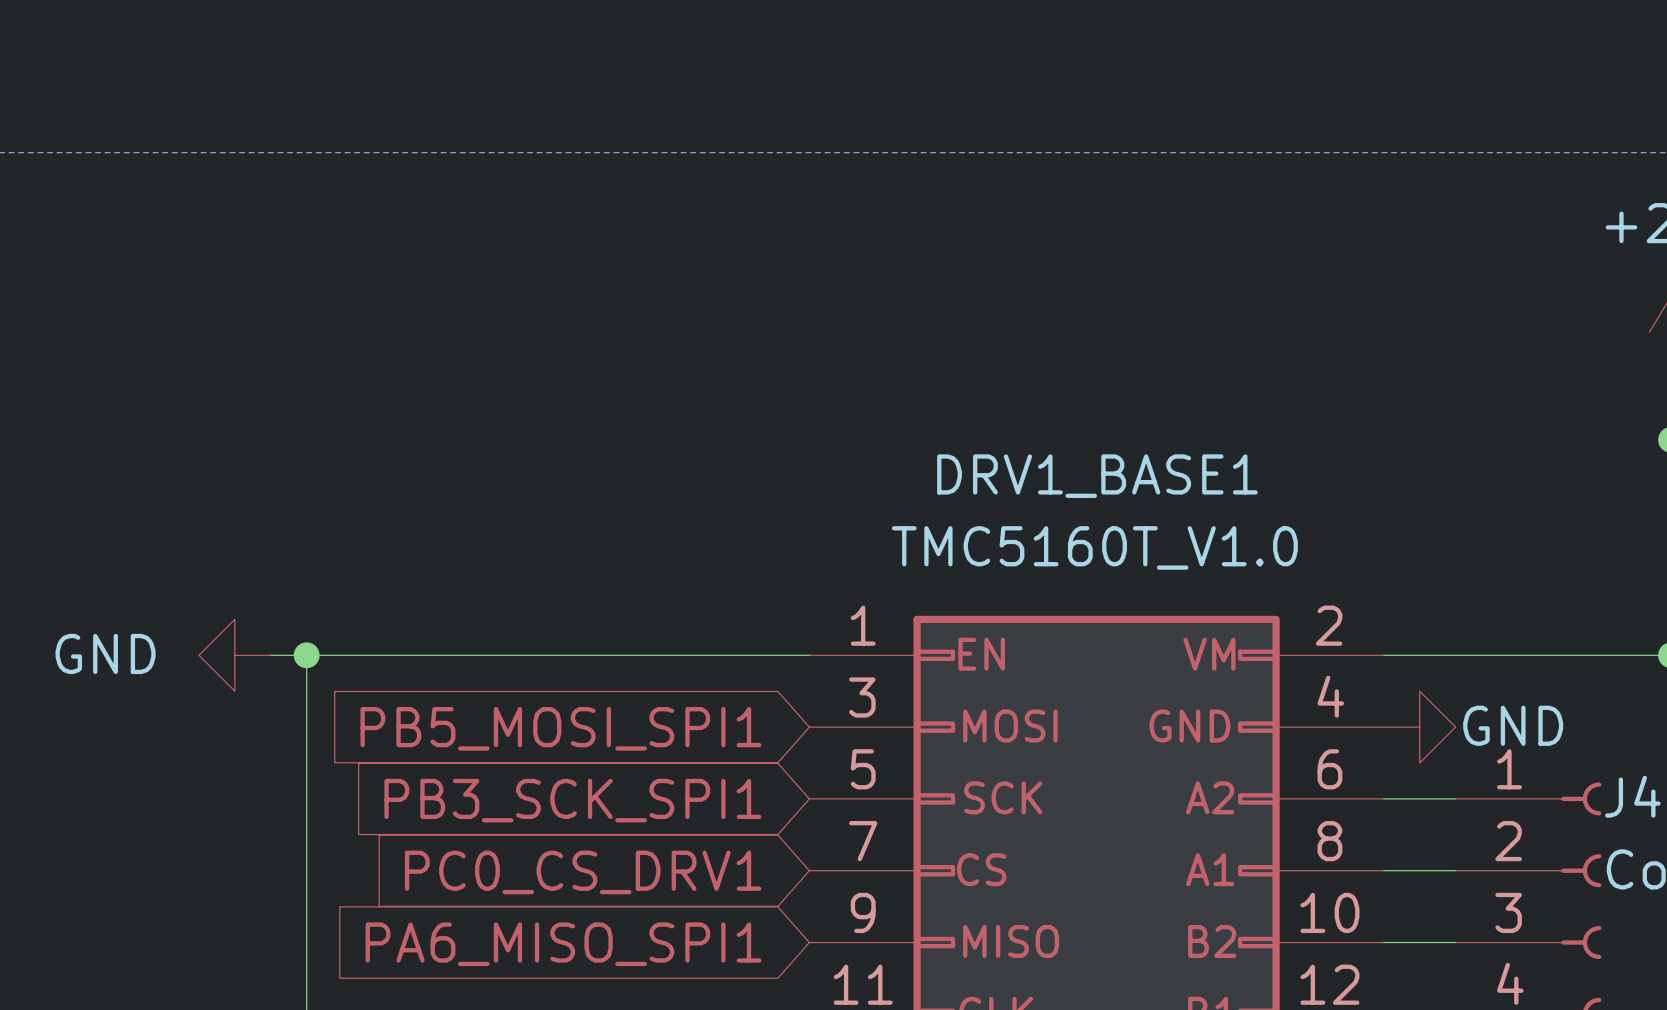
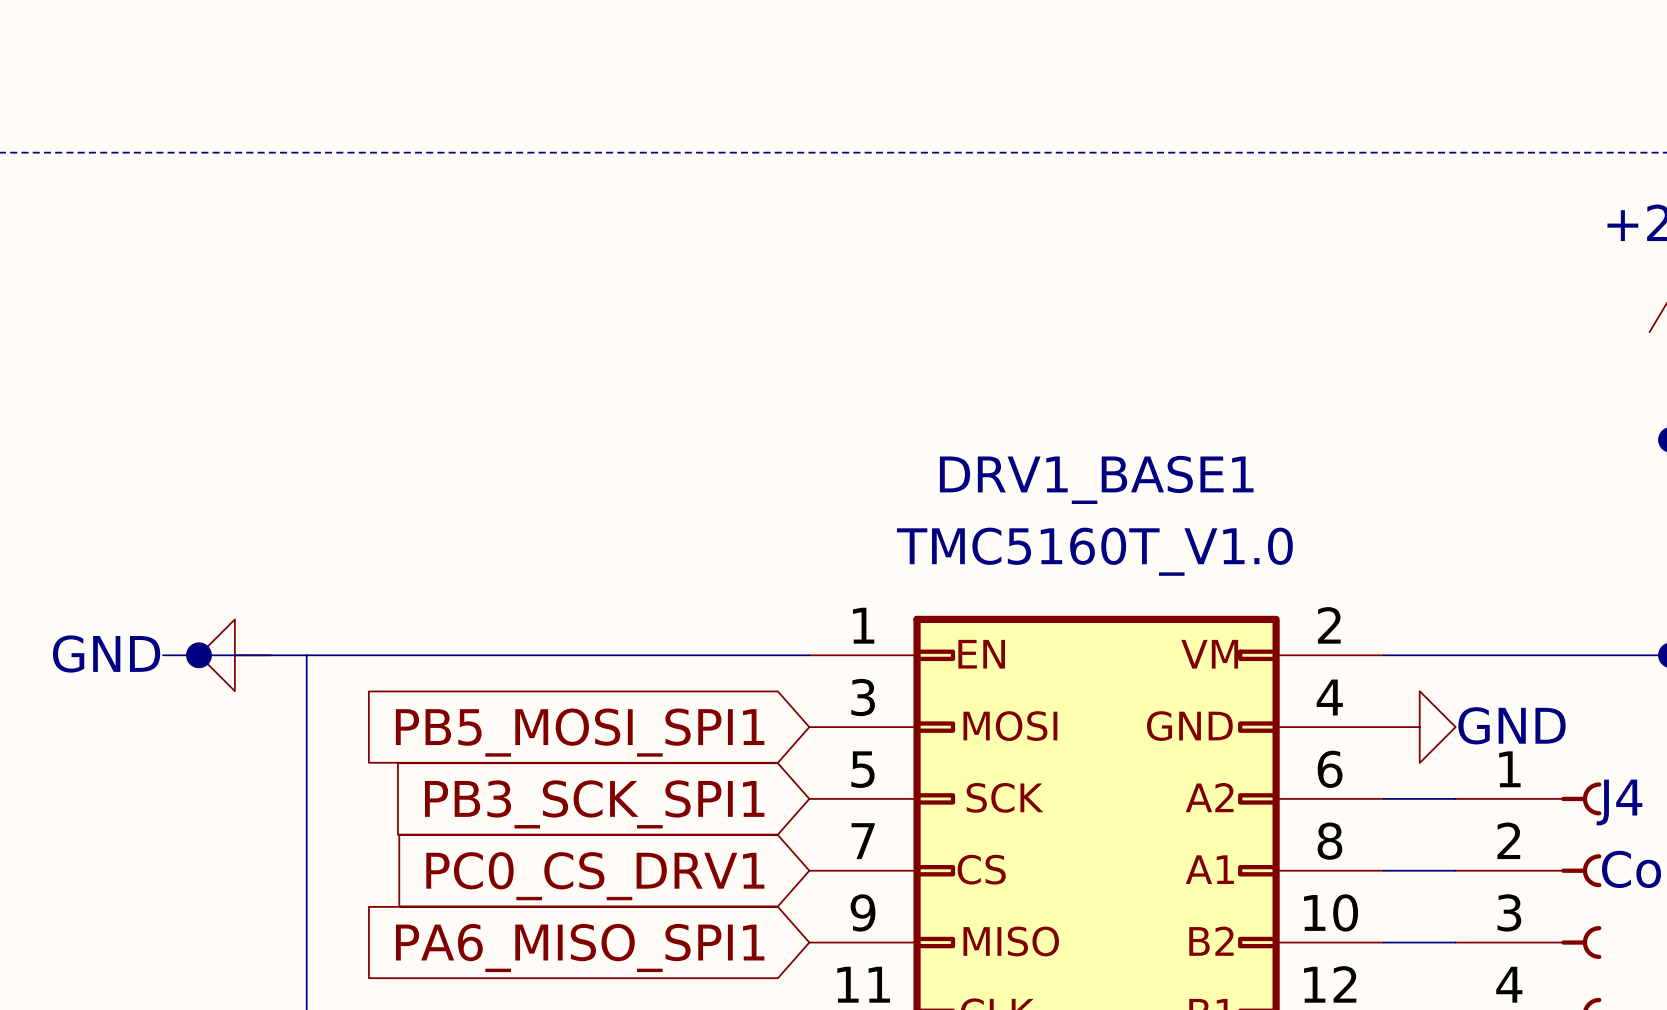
wire: none -> (163, 655) (270, 655)
junction position: (306, 655) -> (198, 655)

